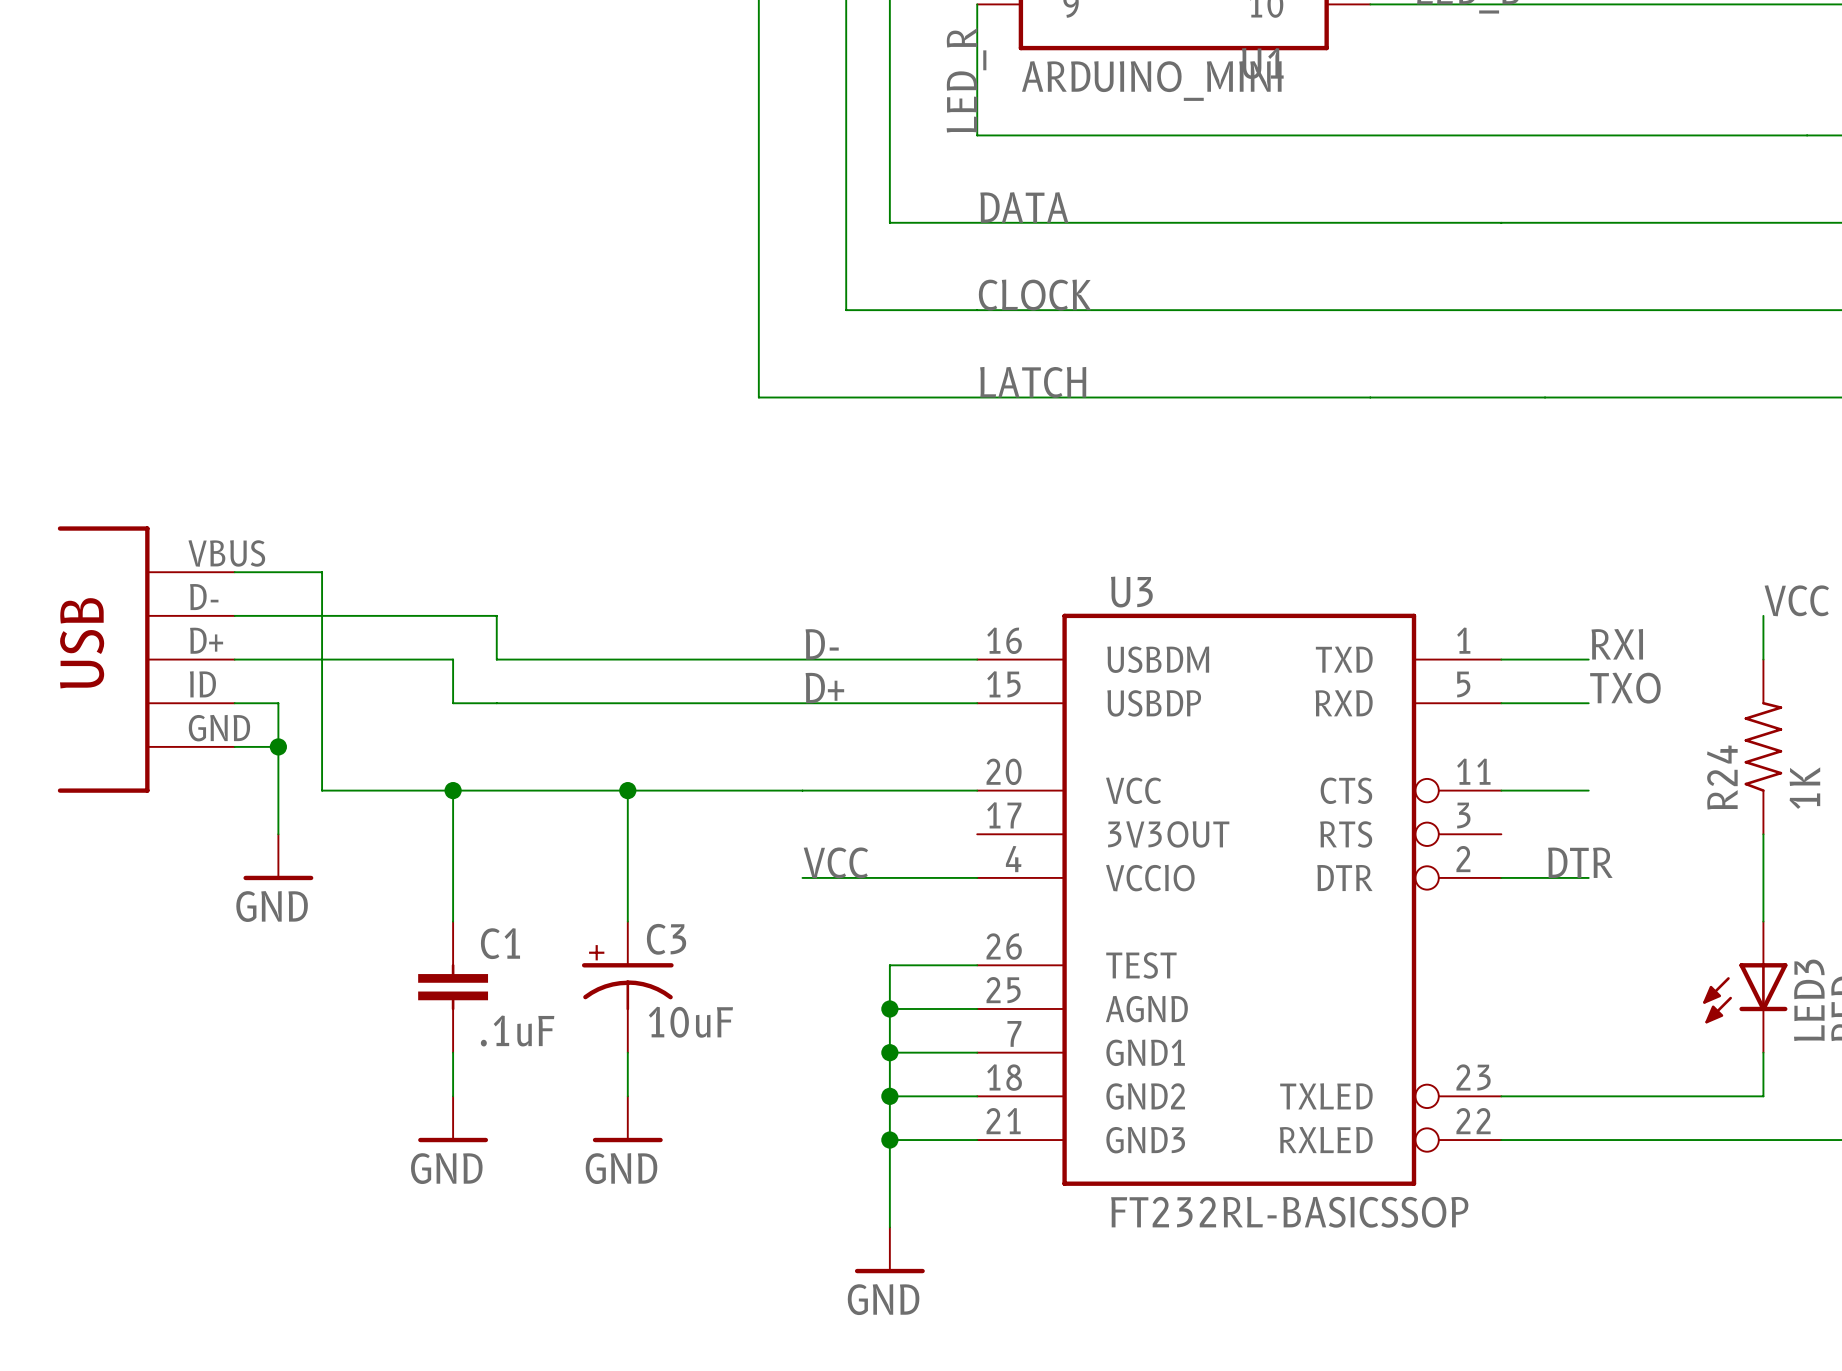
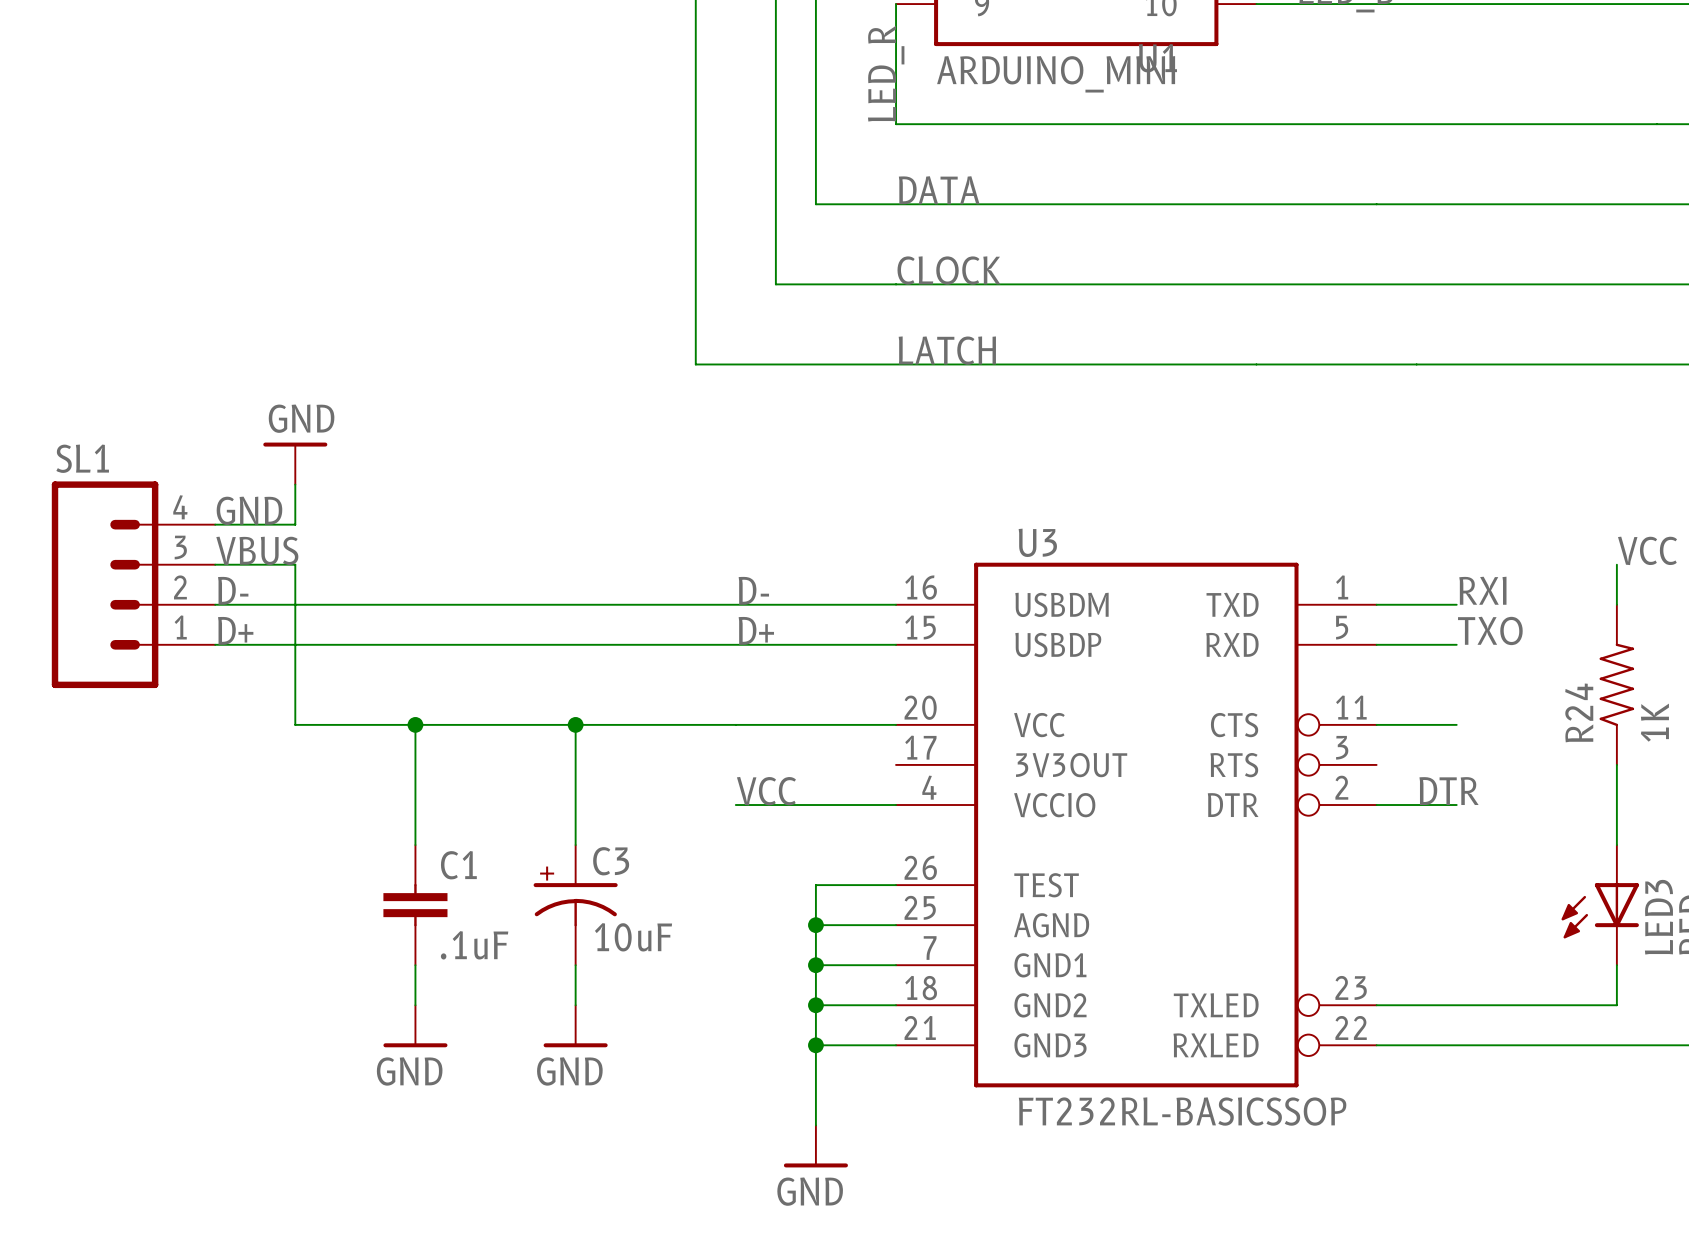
label: none -> GND (249, 510)
wire: (322, 572) (322, 615) (496, 615) (496, 659) -> (295, 524) (295, 484)
label: none -> VBUS (257, 550)
SL1: none -> (133, 584)
label: none -> D- (233, 590)
part: (146, 659) -> none
wire: (453, 659) (453, 703) -> (415, 604) (455, 604)
label: none -> D+ (235, 630)
wire: (278, 703) (278, 834) -> (255, 644) (415, 644)
wire: (234, 746) (278, 746) -> none
junction: (278, 746) -> none
power symbol position: GND (278, 857) -> GND (295, 463)
power symbol rotation: 0° (278, 877) -> 180° (295, 444)

